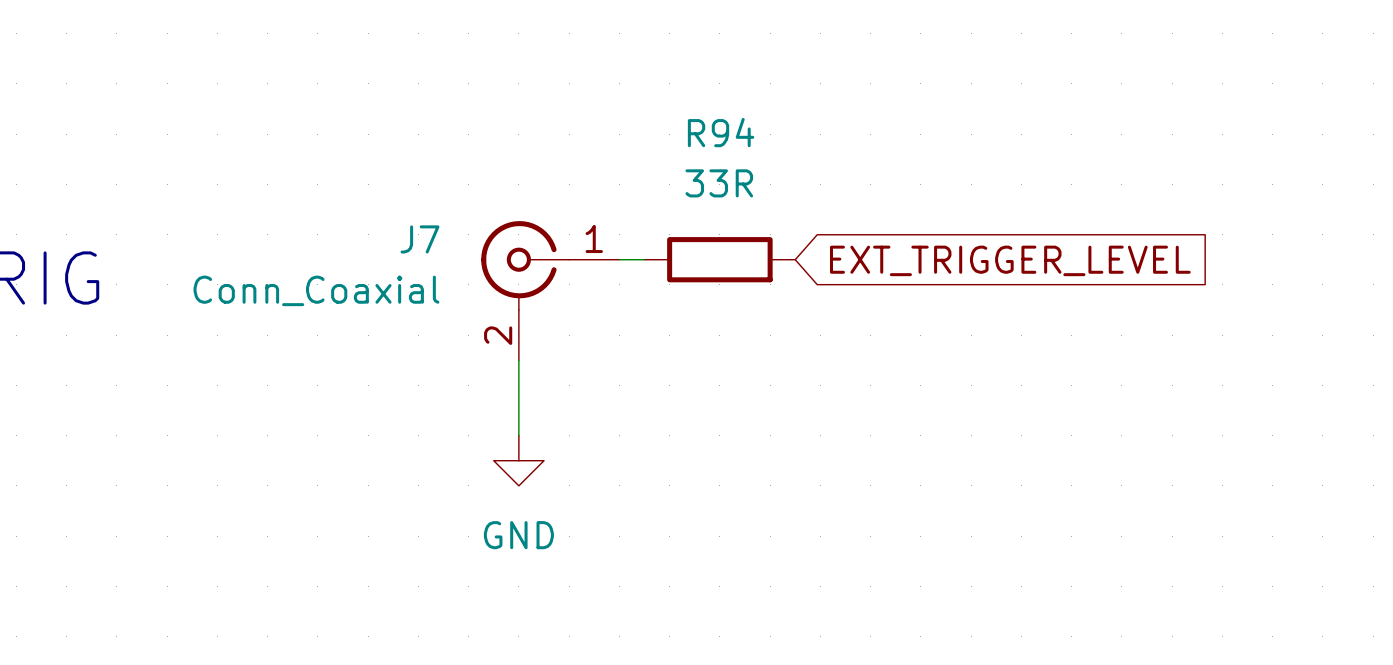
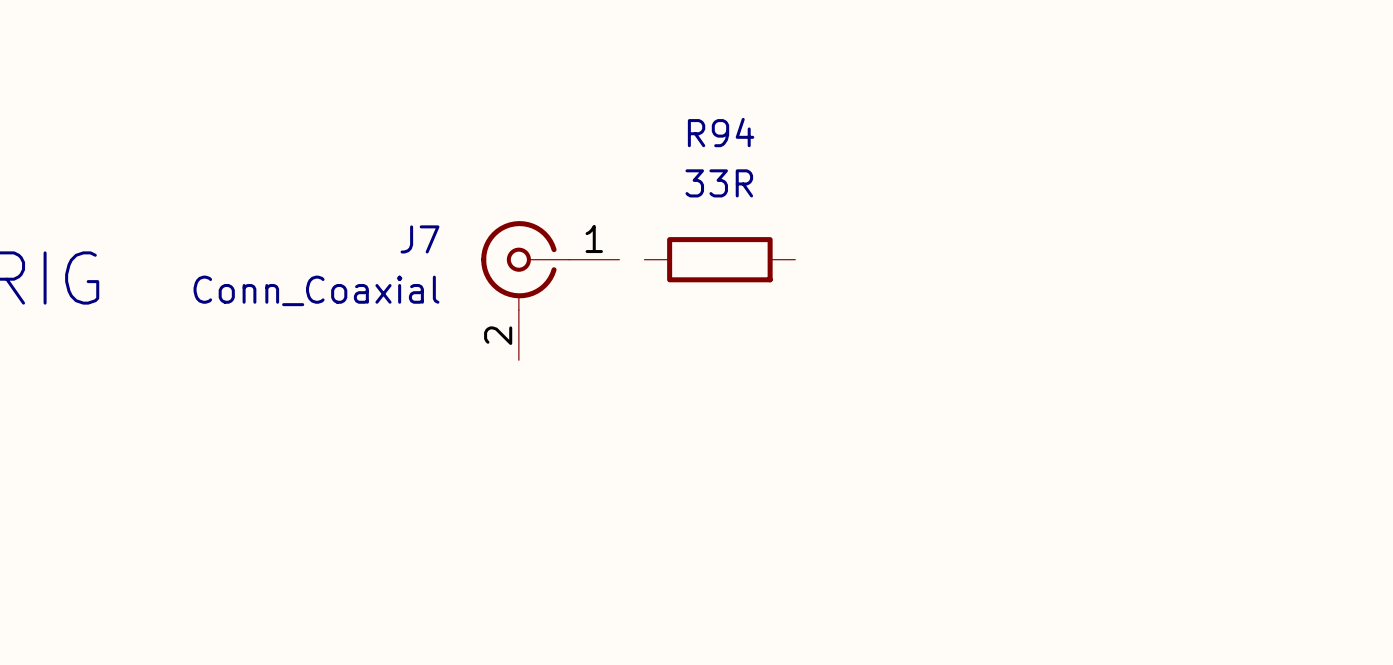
wire: (619, 259) (644, 259) -> none
global label: EXT_TRIGGER_LEVEL (1010, 260) -> none
wire: (518, 360) (518, 435) -> none
power symbol: GND (518, 460) -> none

